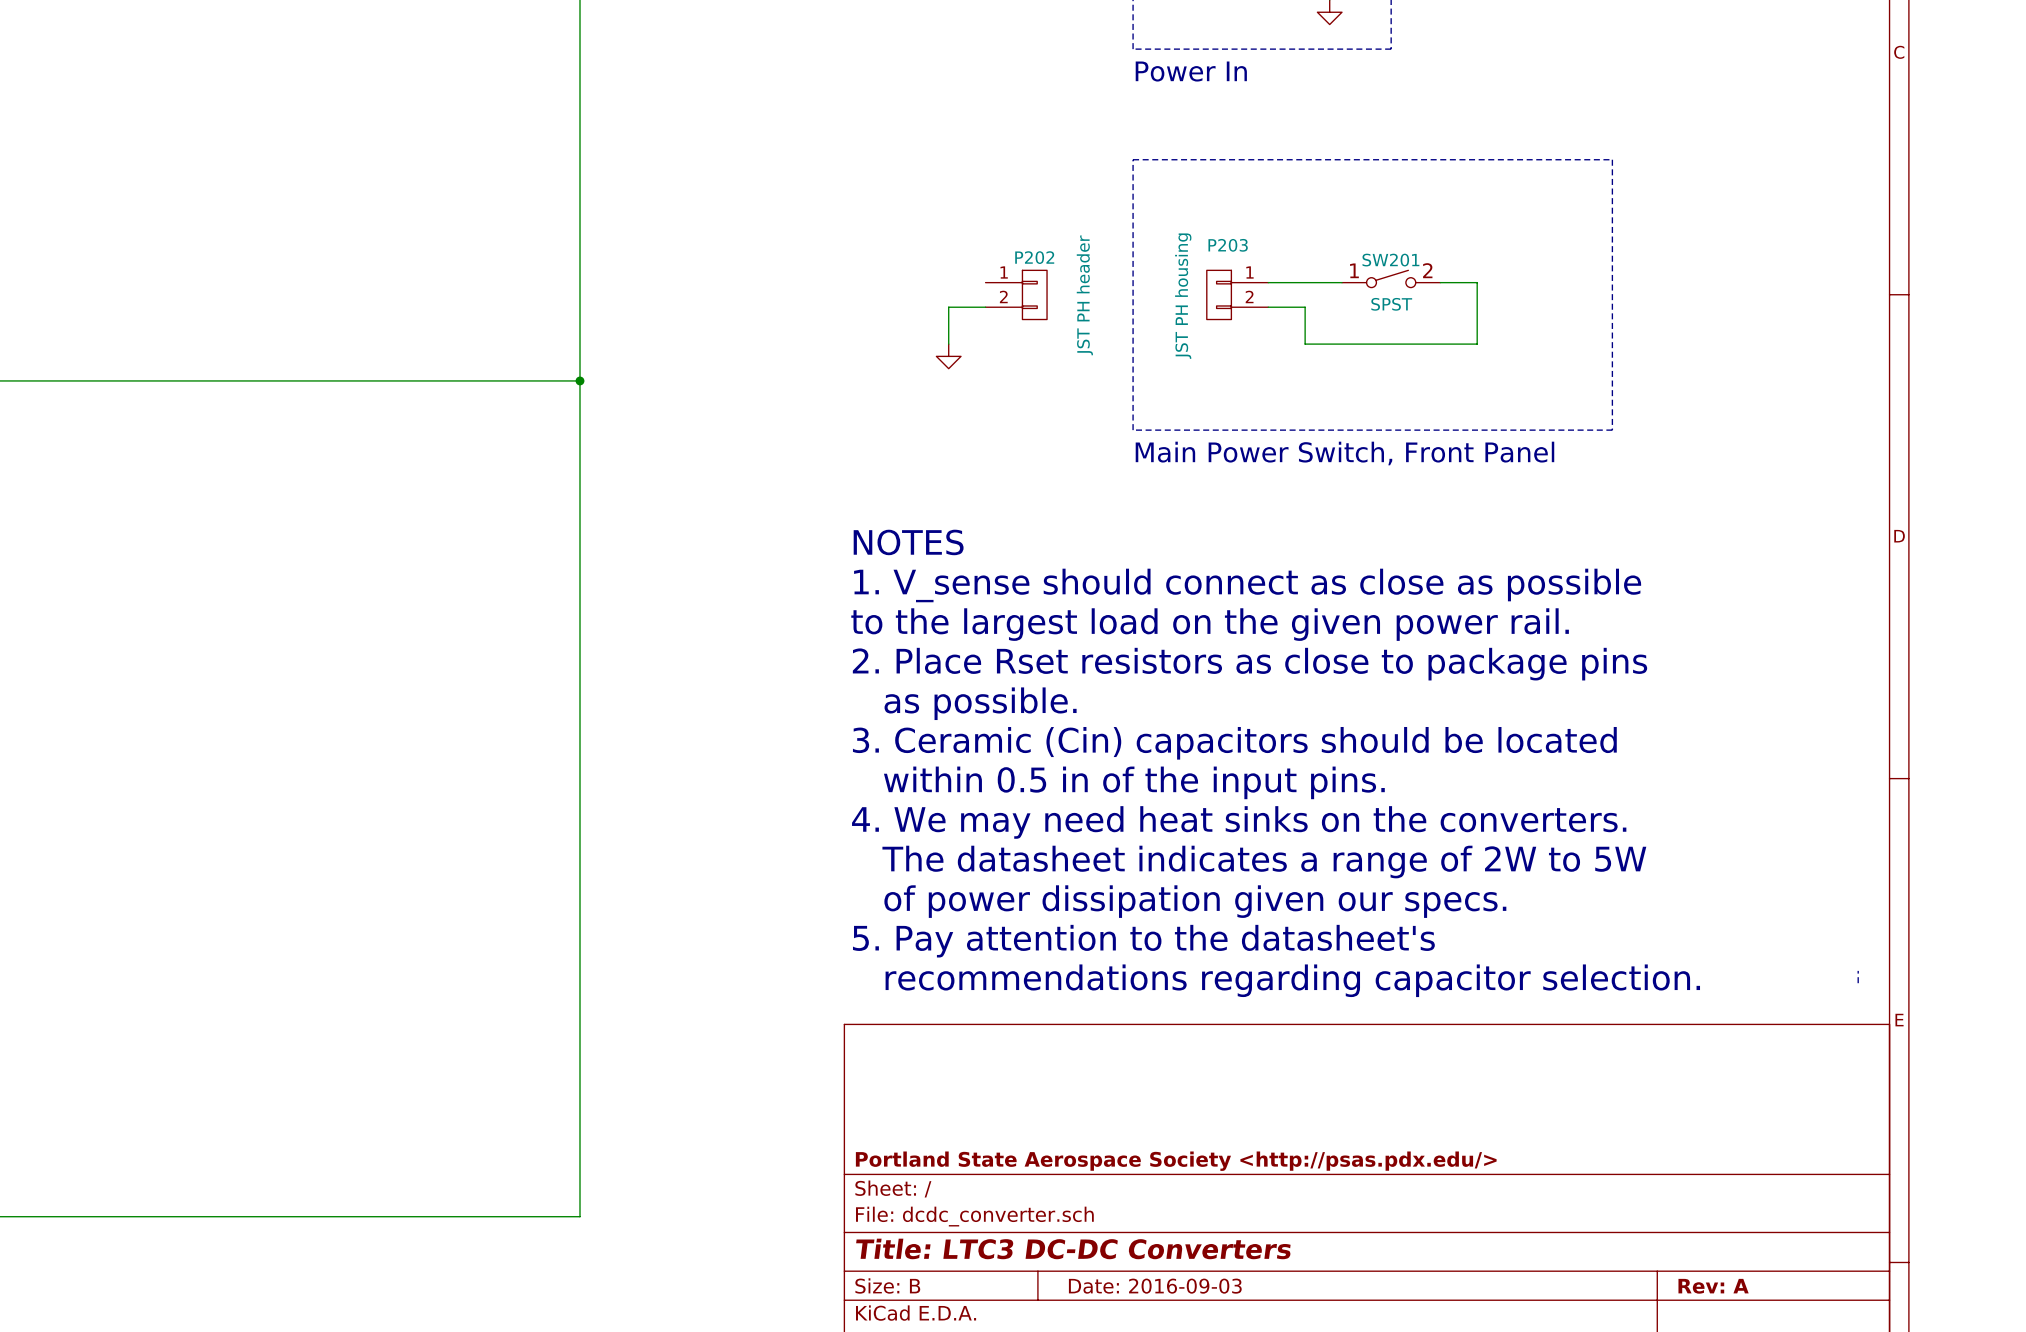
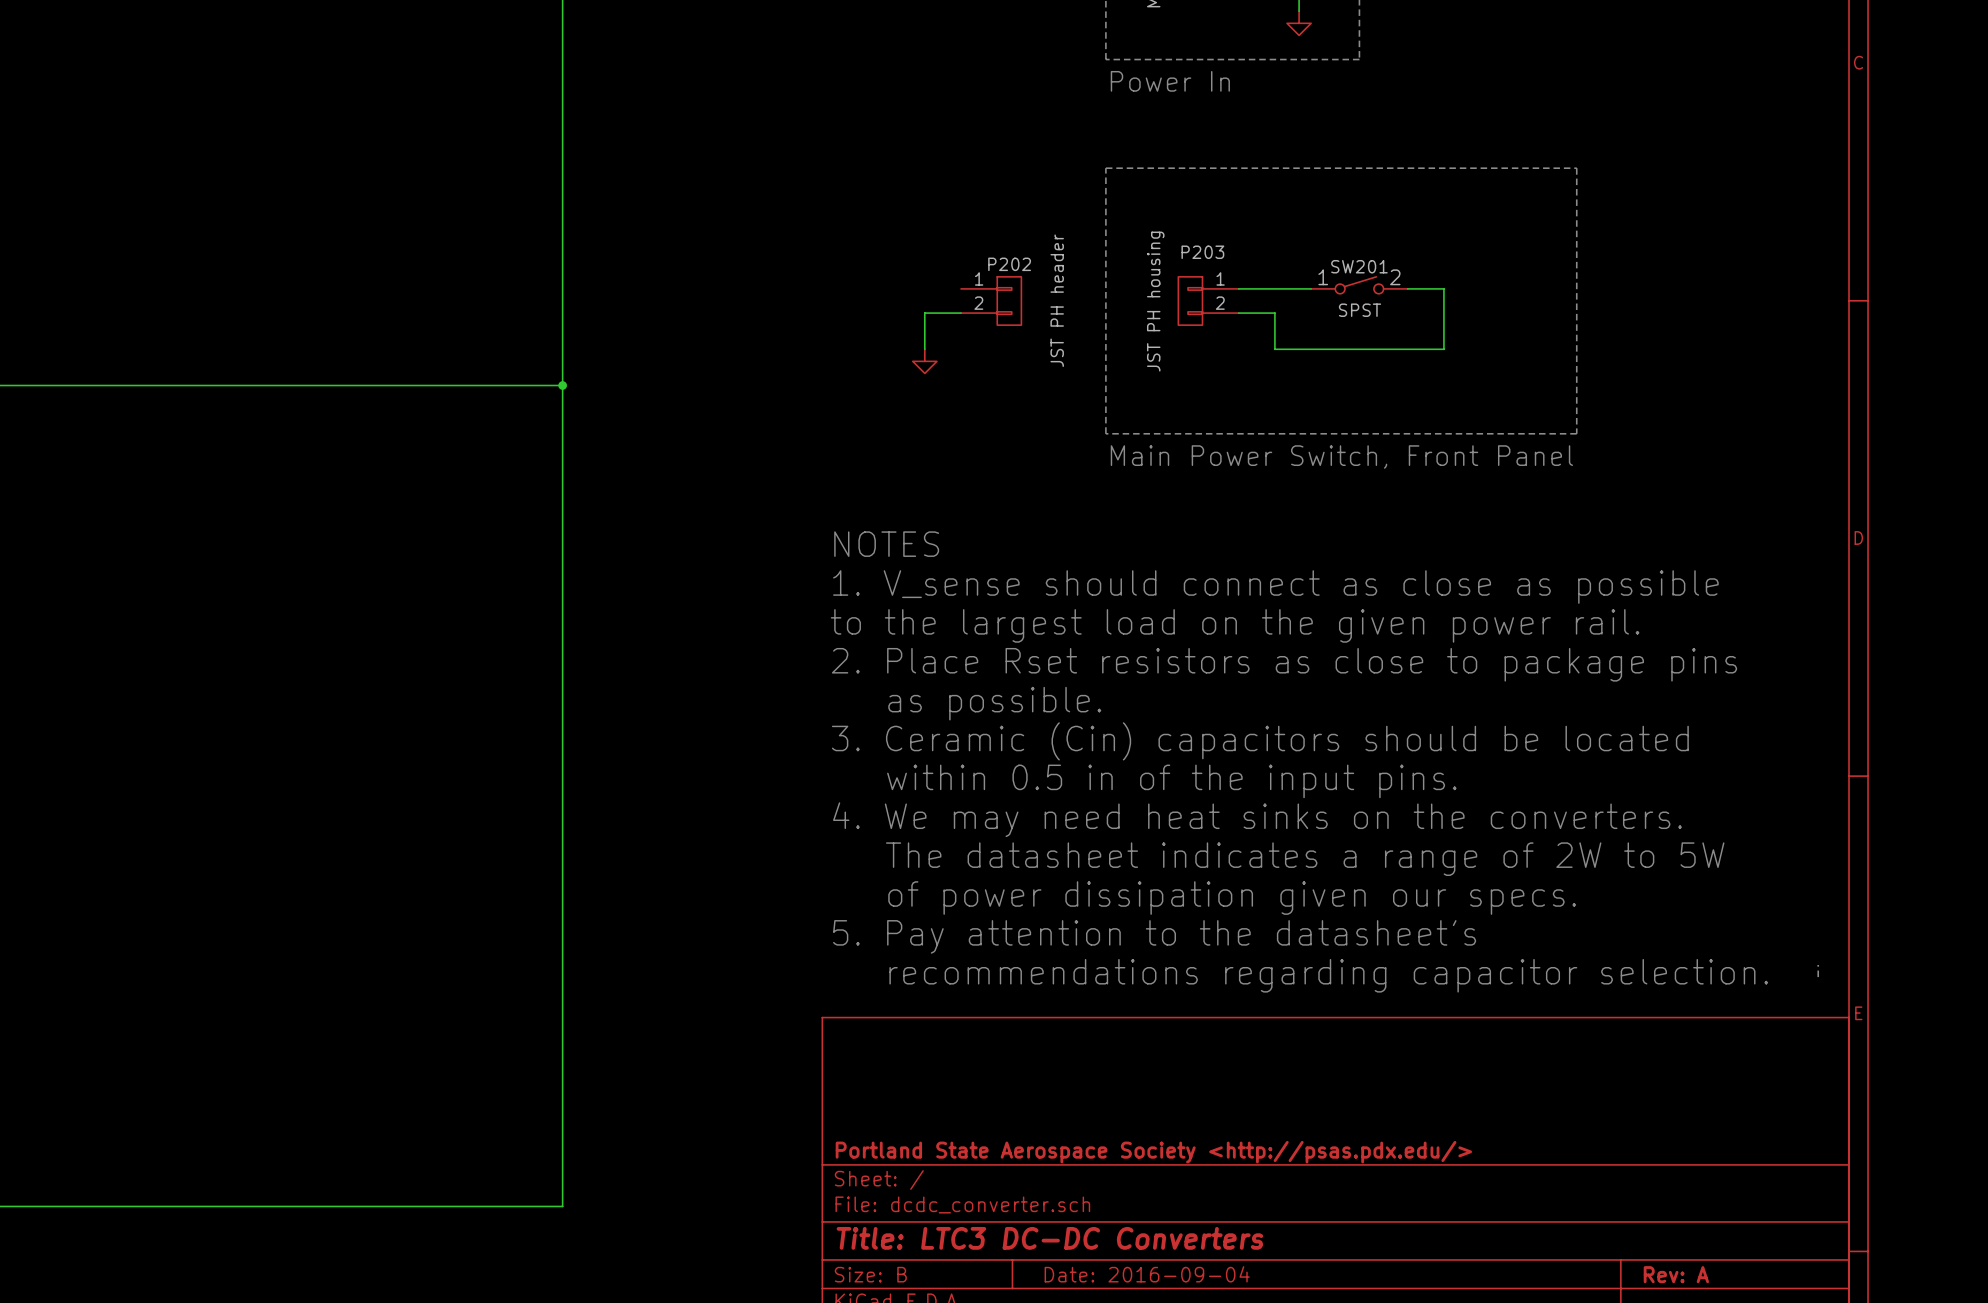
title block: Date: 2016-09-03 (1155, 1286) -> Date: 2016-09-04 (1147, 1274)

